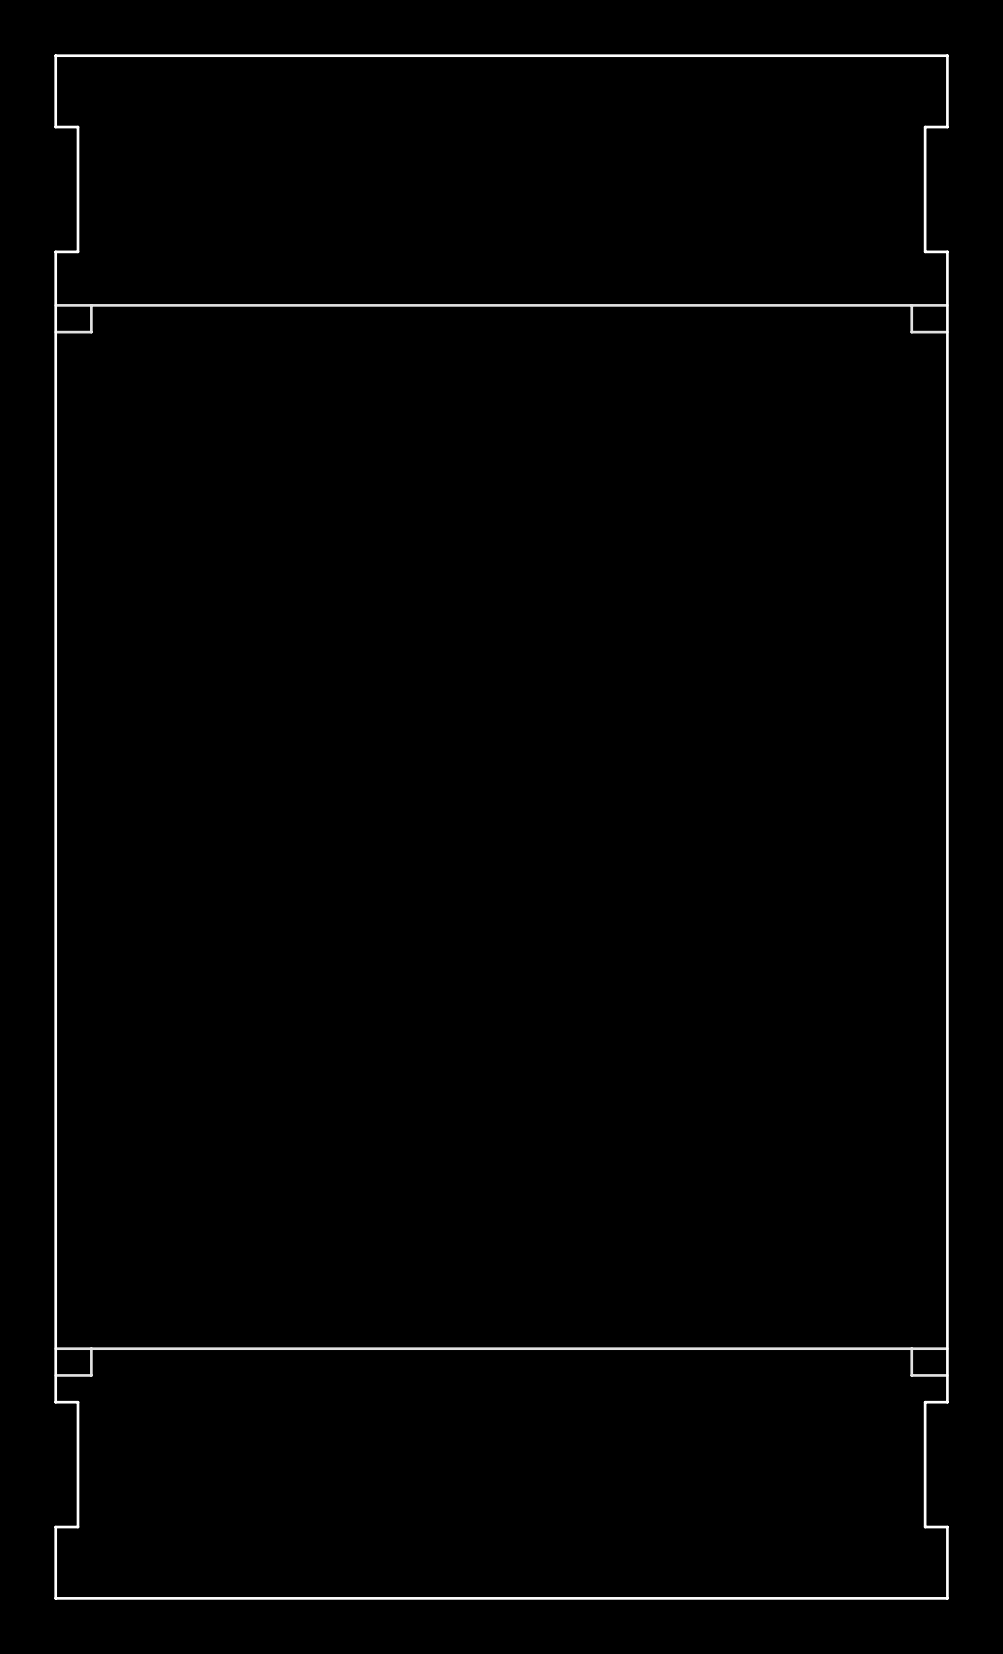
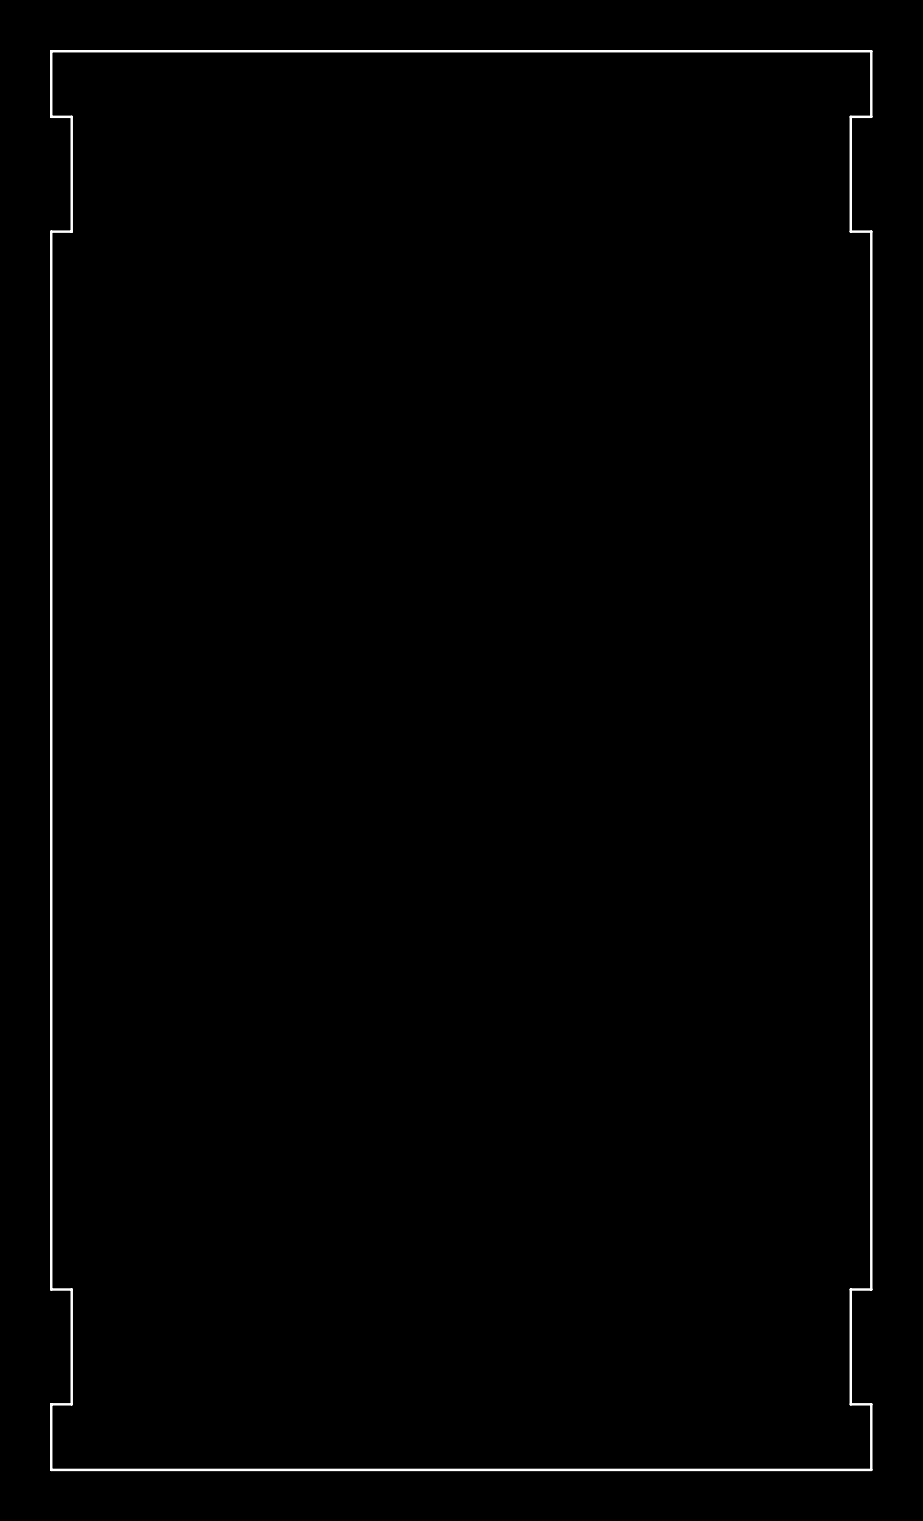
line: (55, 305) (947, 305) -> none
line: (91, 305) (91, 332) (55, 332) -> none
line: (911, 305) (911, 332) (947, 332) -> none
line: (55, 1348) (947, 1348) -> none
line: (91, 1348) (91, 1375) (55, 1375) -> none
line: (911, 1348) (911, 1375) (947, 1375) -> none

